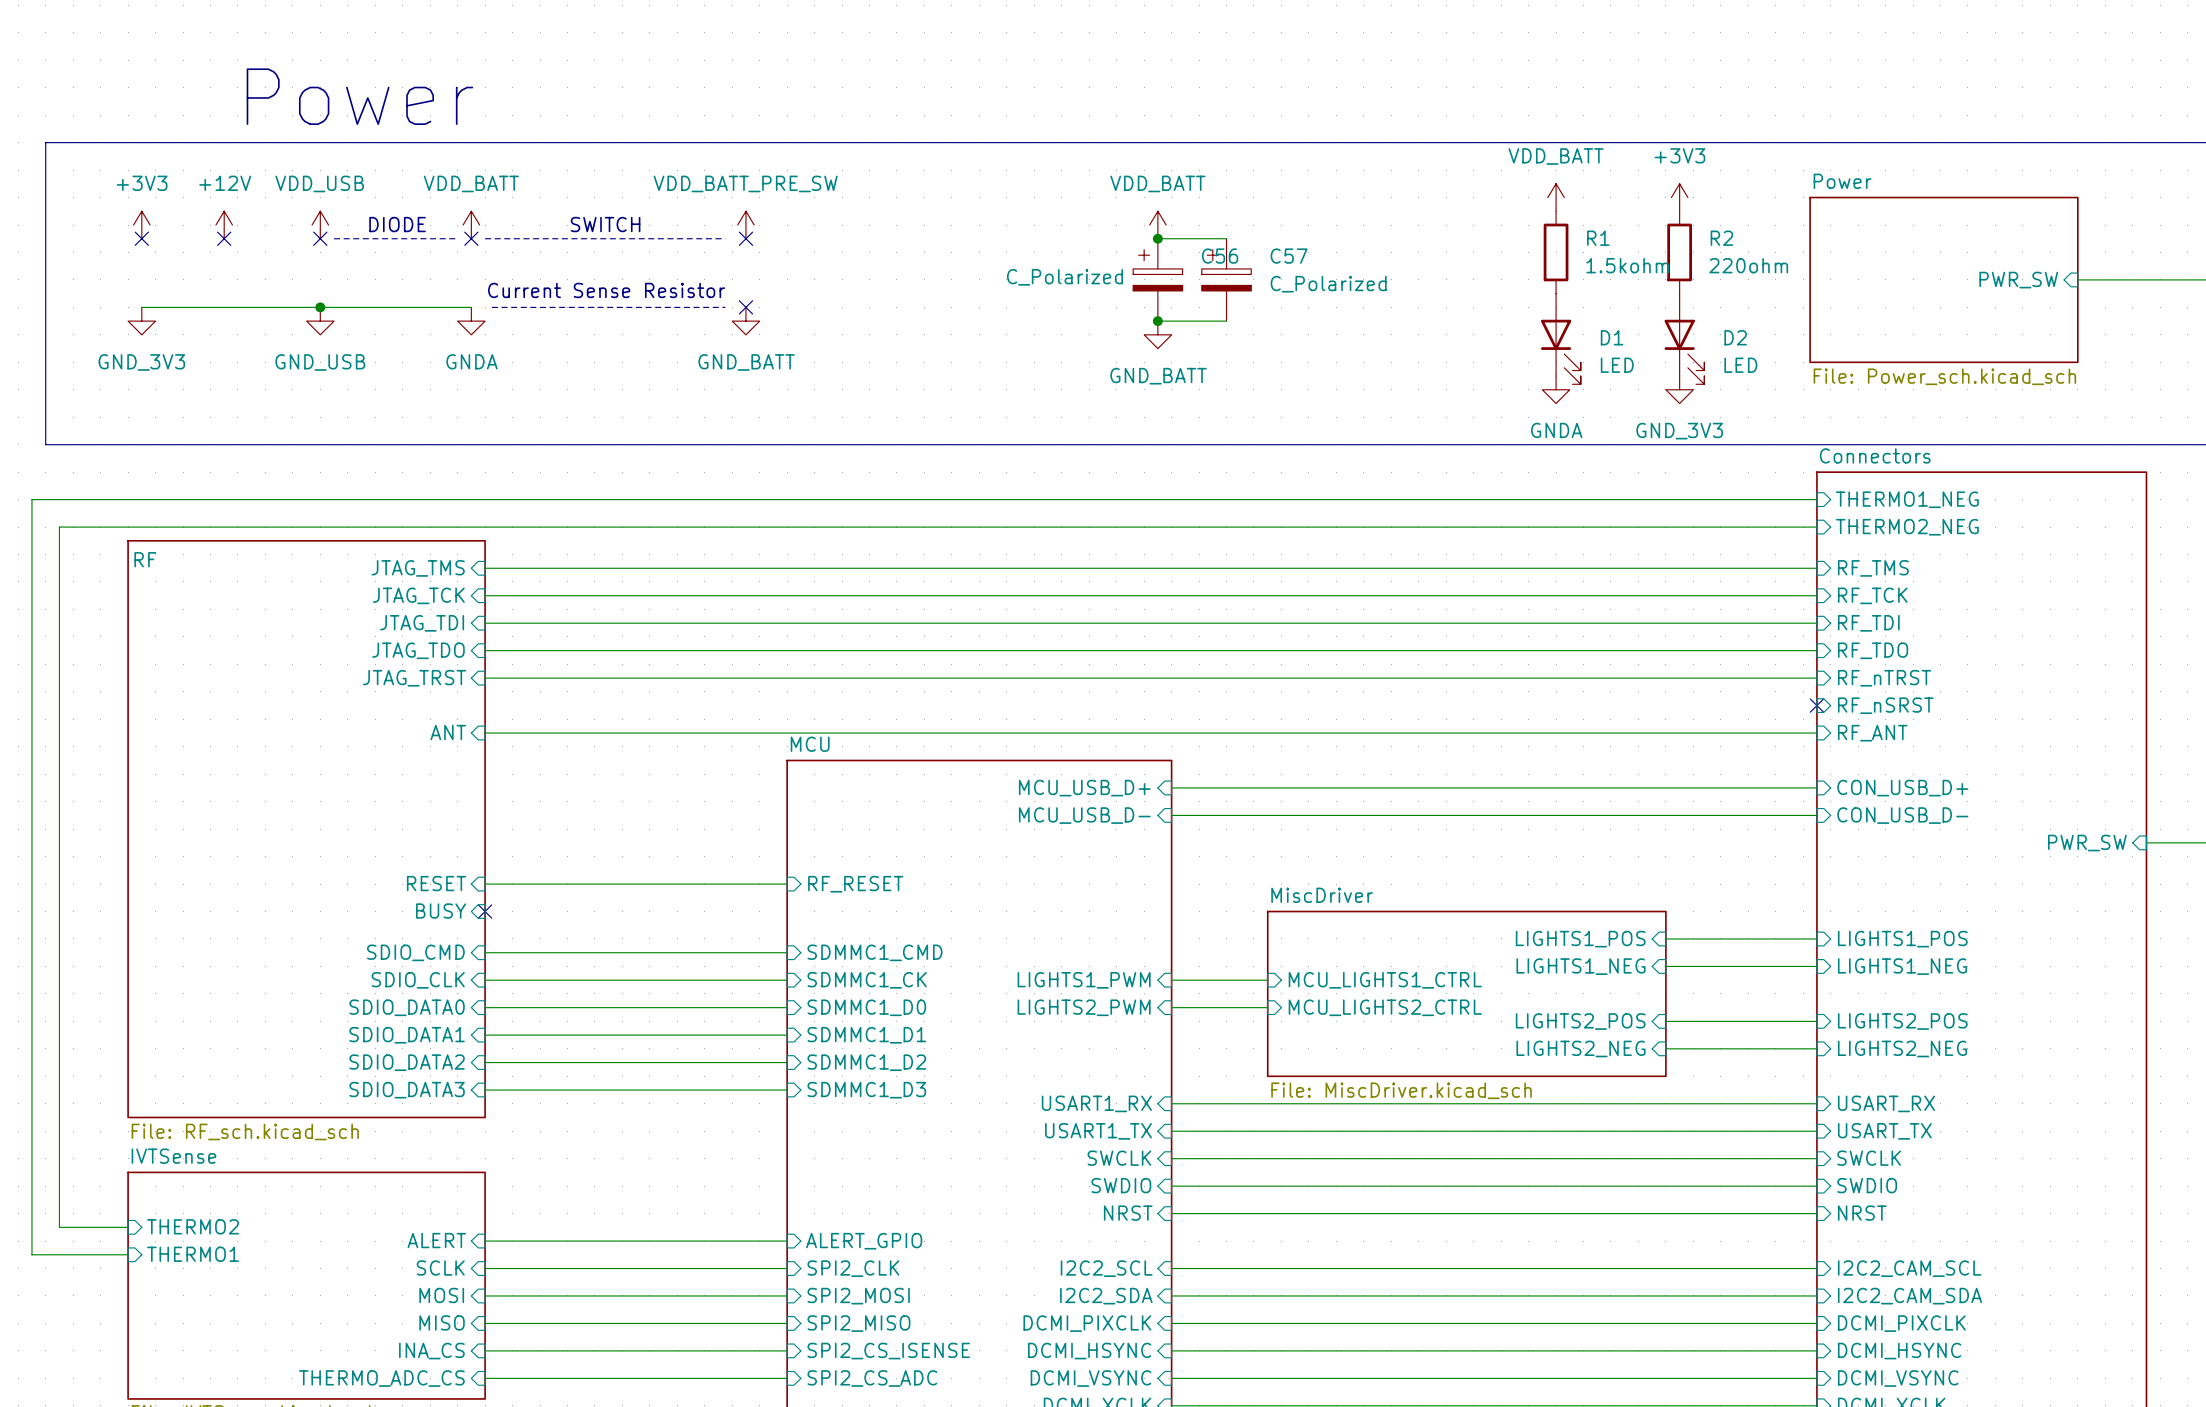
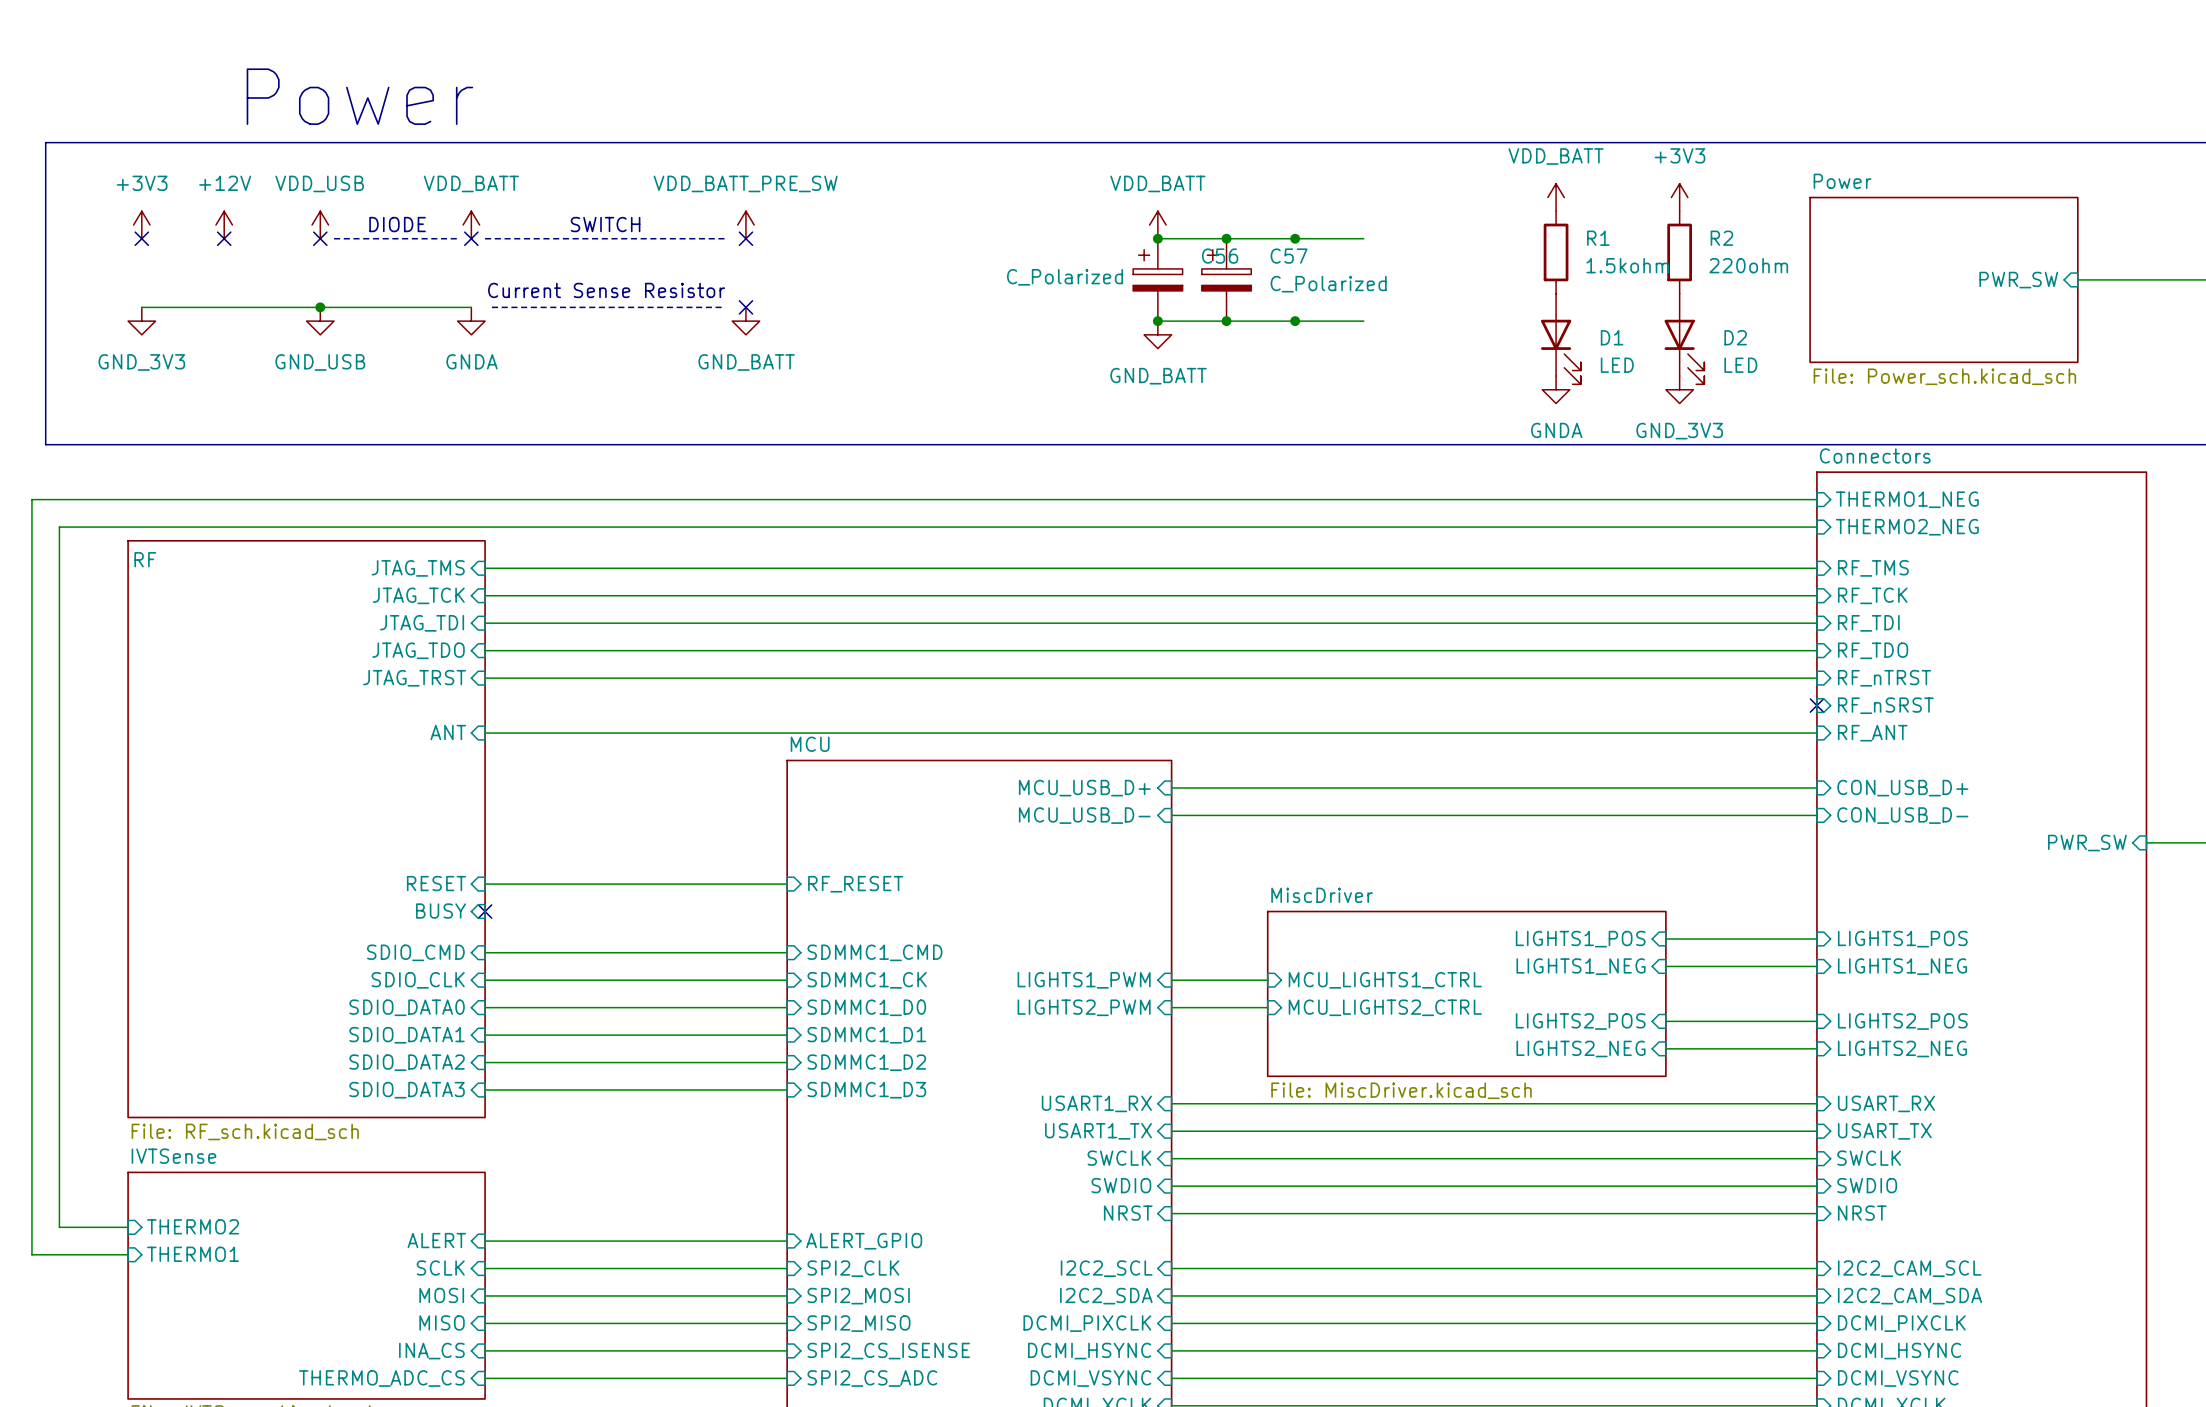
wire: none -> (1226, 238) (1363, 238)
junction: none -> (1226, 238)
junction: none -> (1295, 238)
wire: none -> (1226, 321) (1363, 321)
junction: none -> (1226, 321)
junction: none -> (1295, 321)

